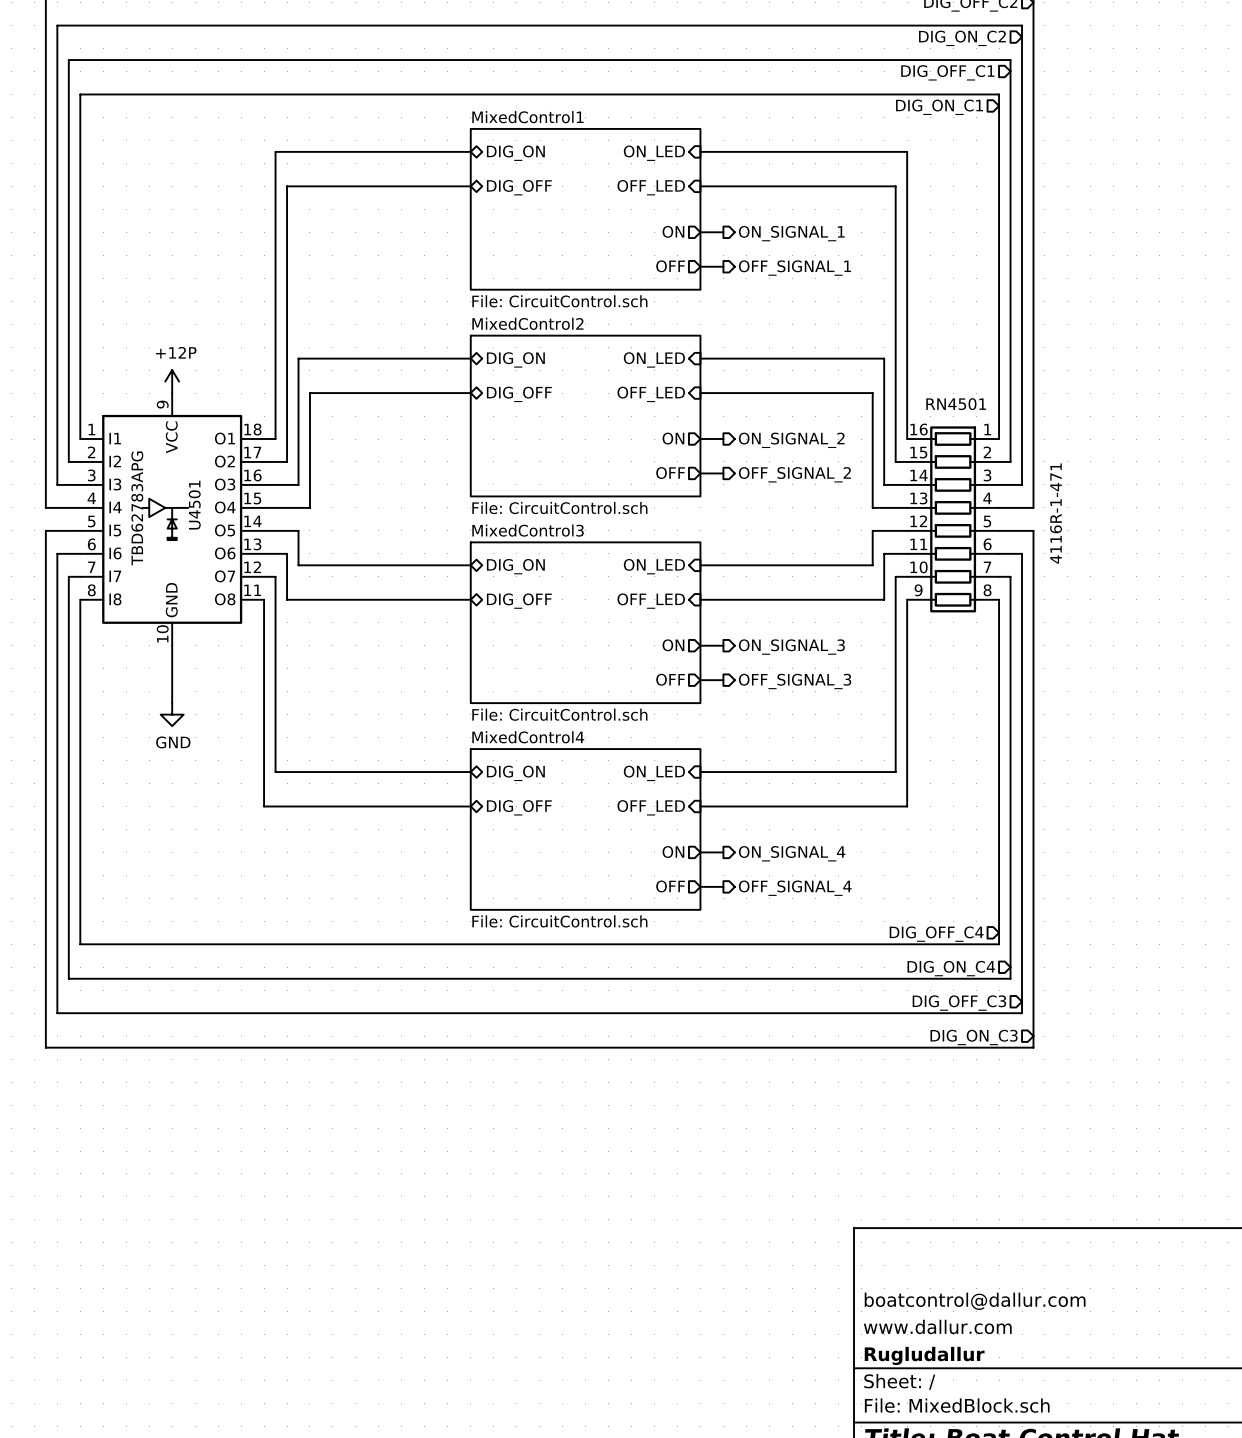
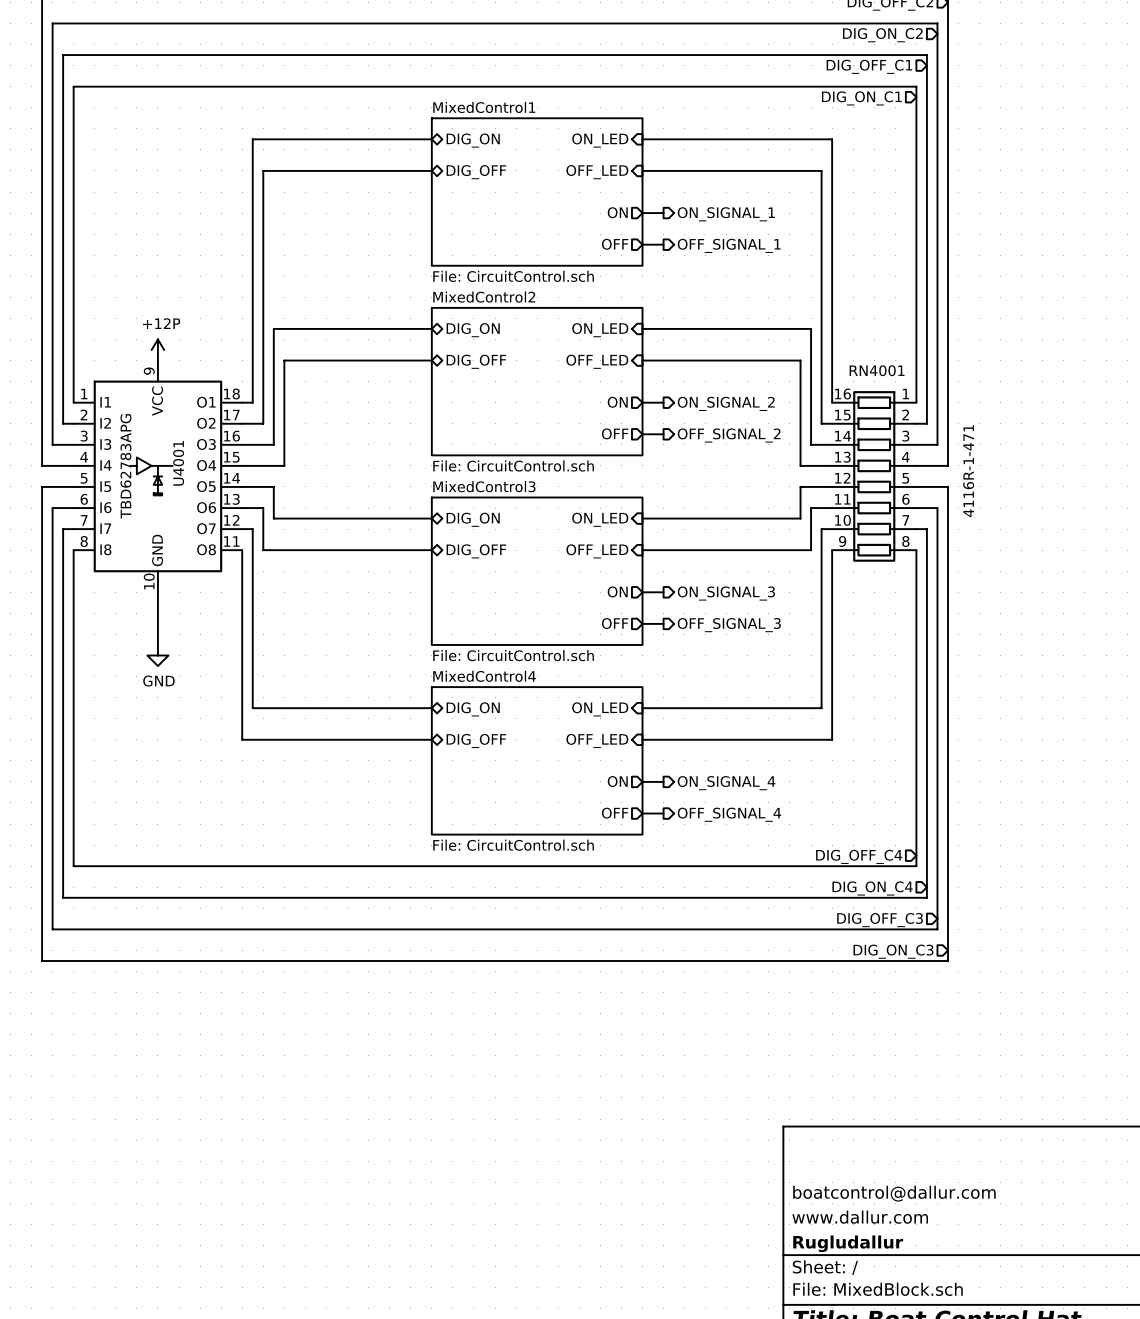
RN4501 name: RN4501 (956, 404) -> RN4001 (877, 370)
U4501 name: U4501 (194, 505) -> U4001 (178, 463)

